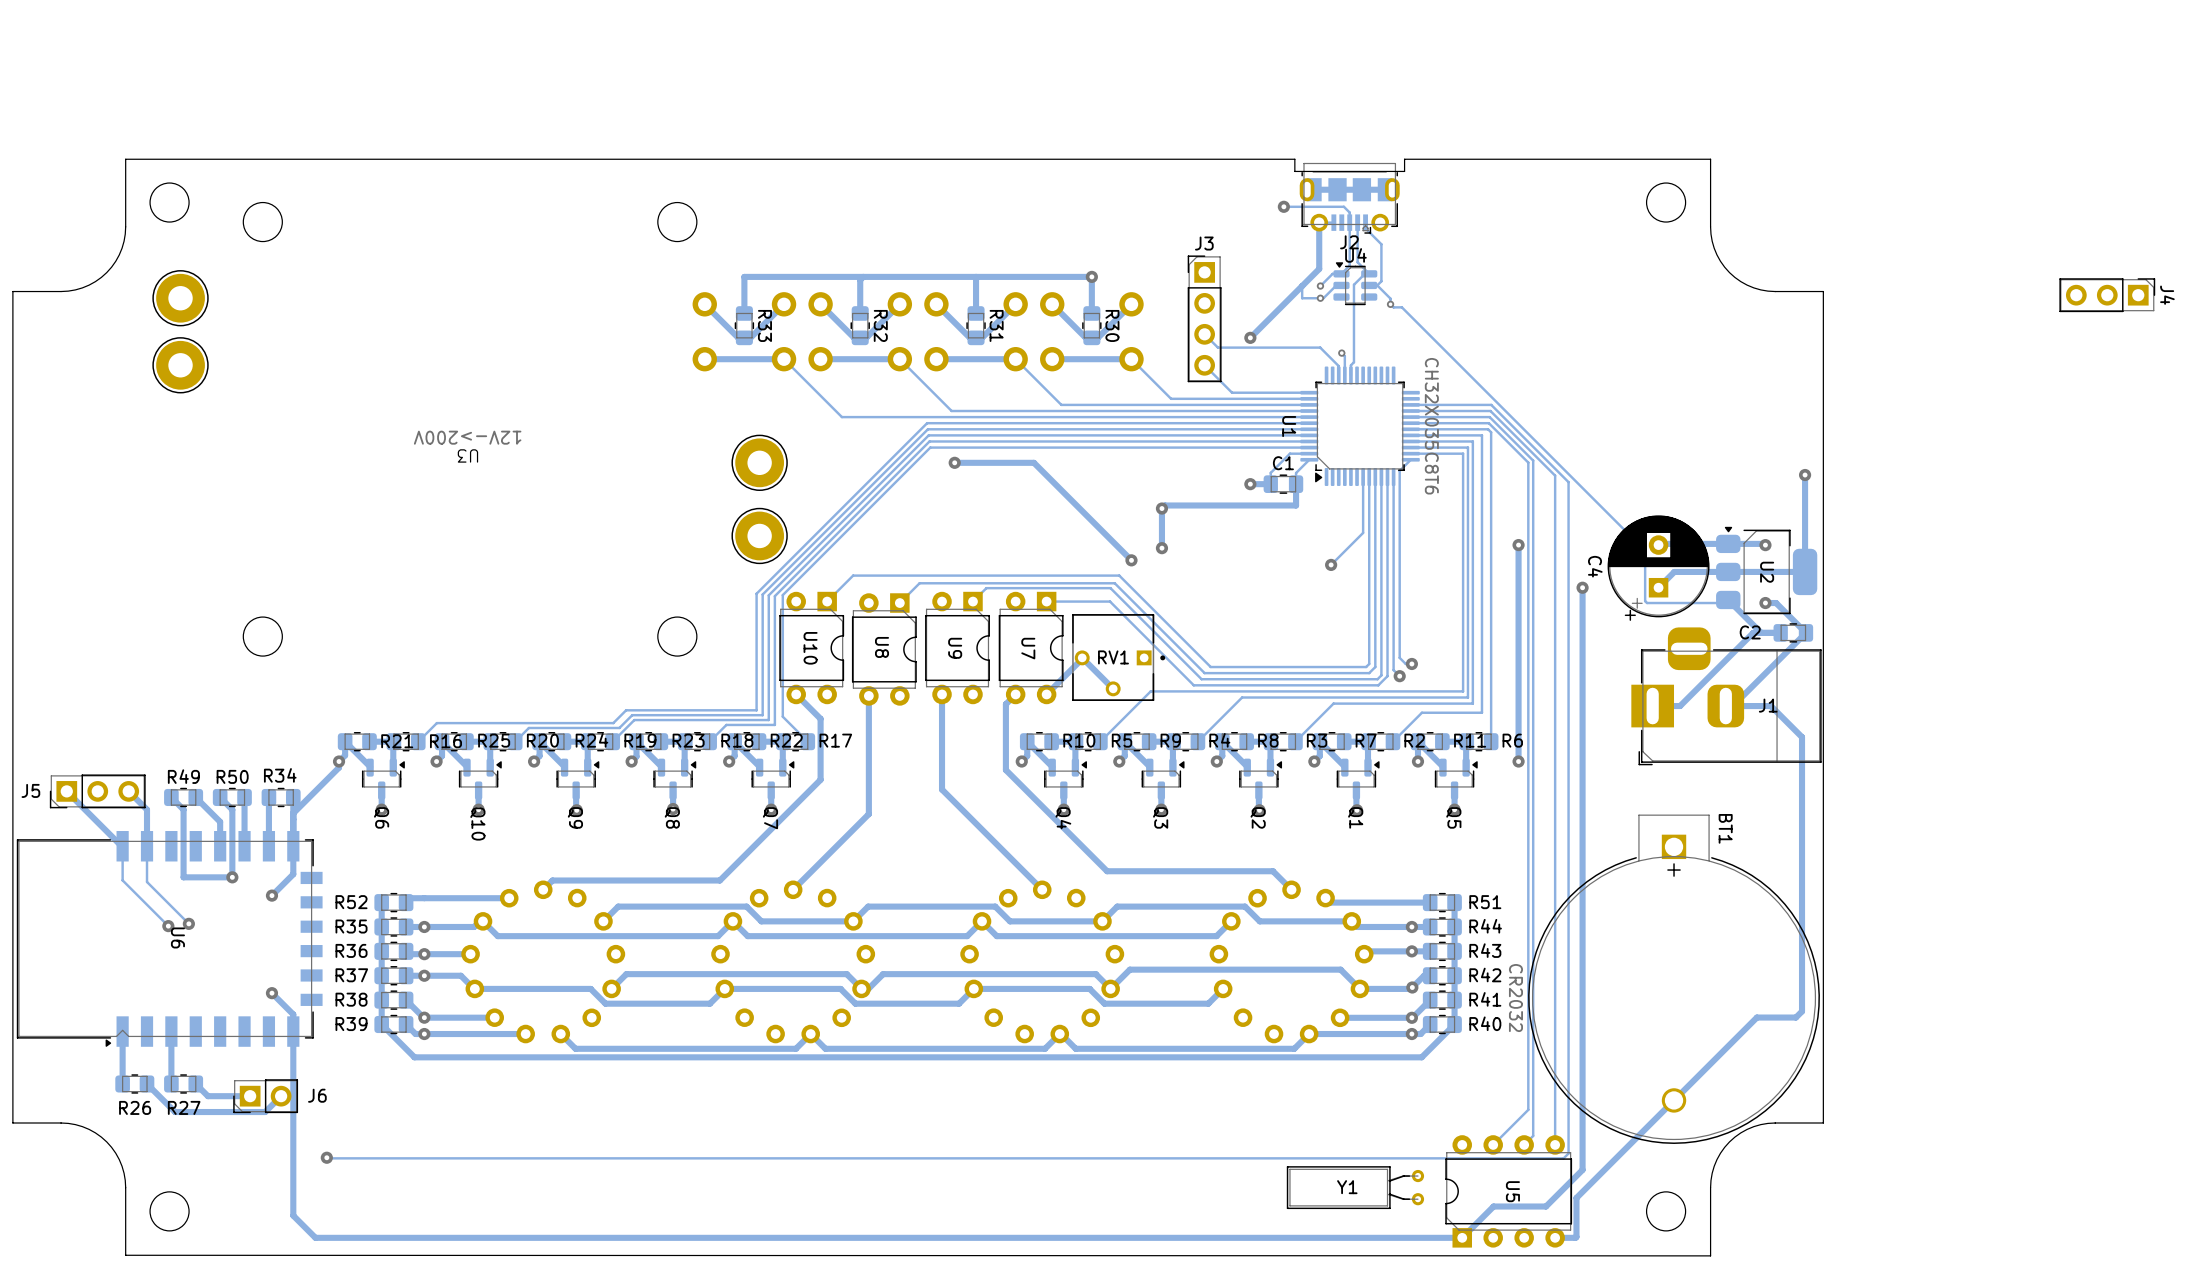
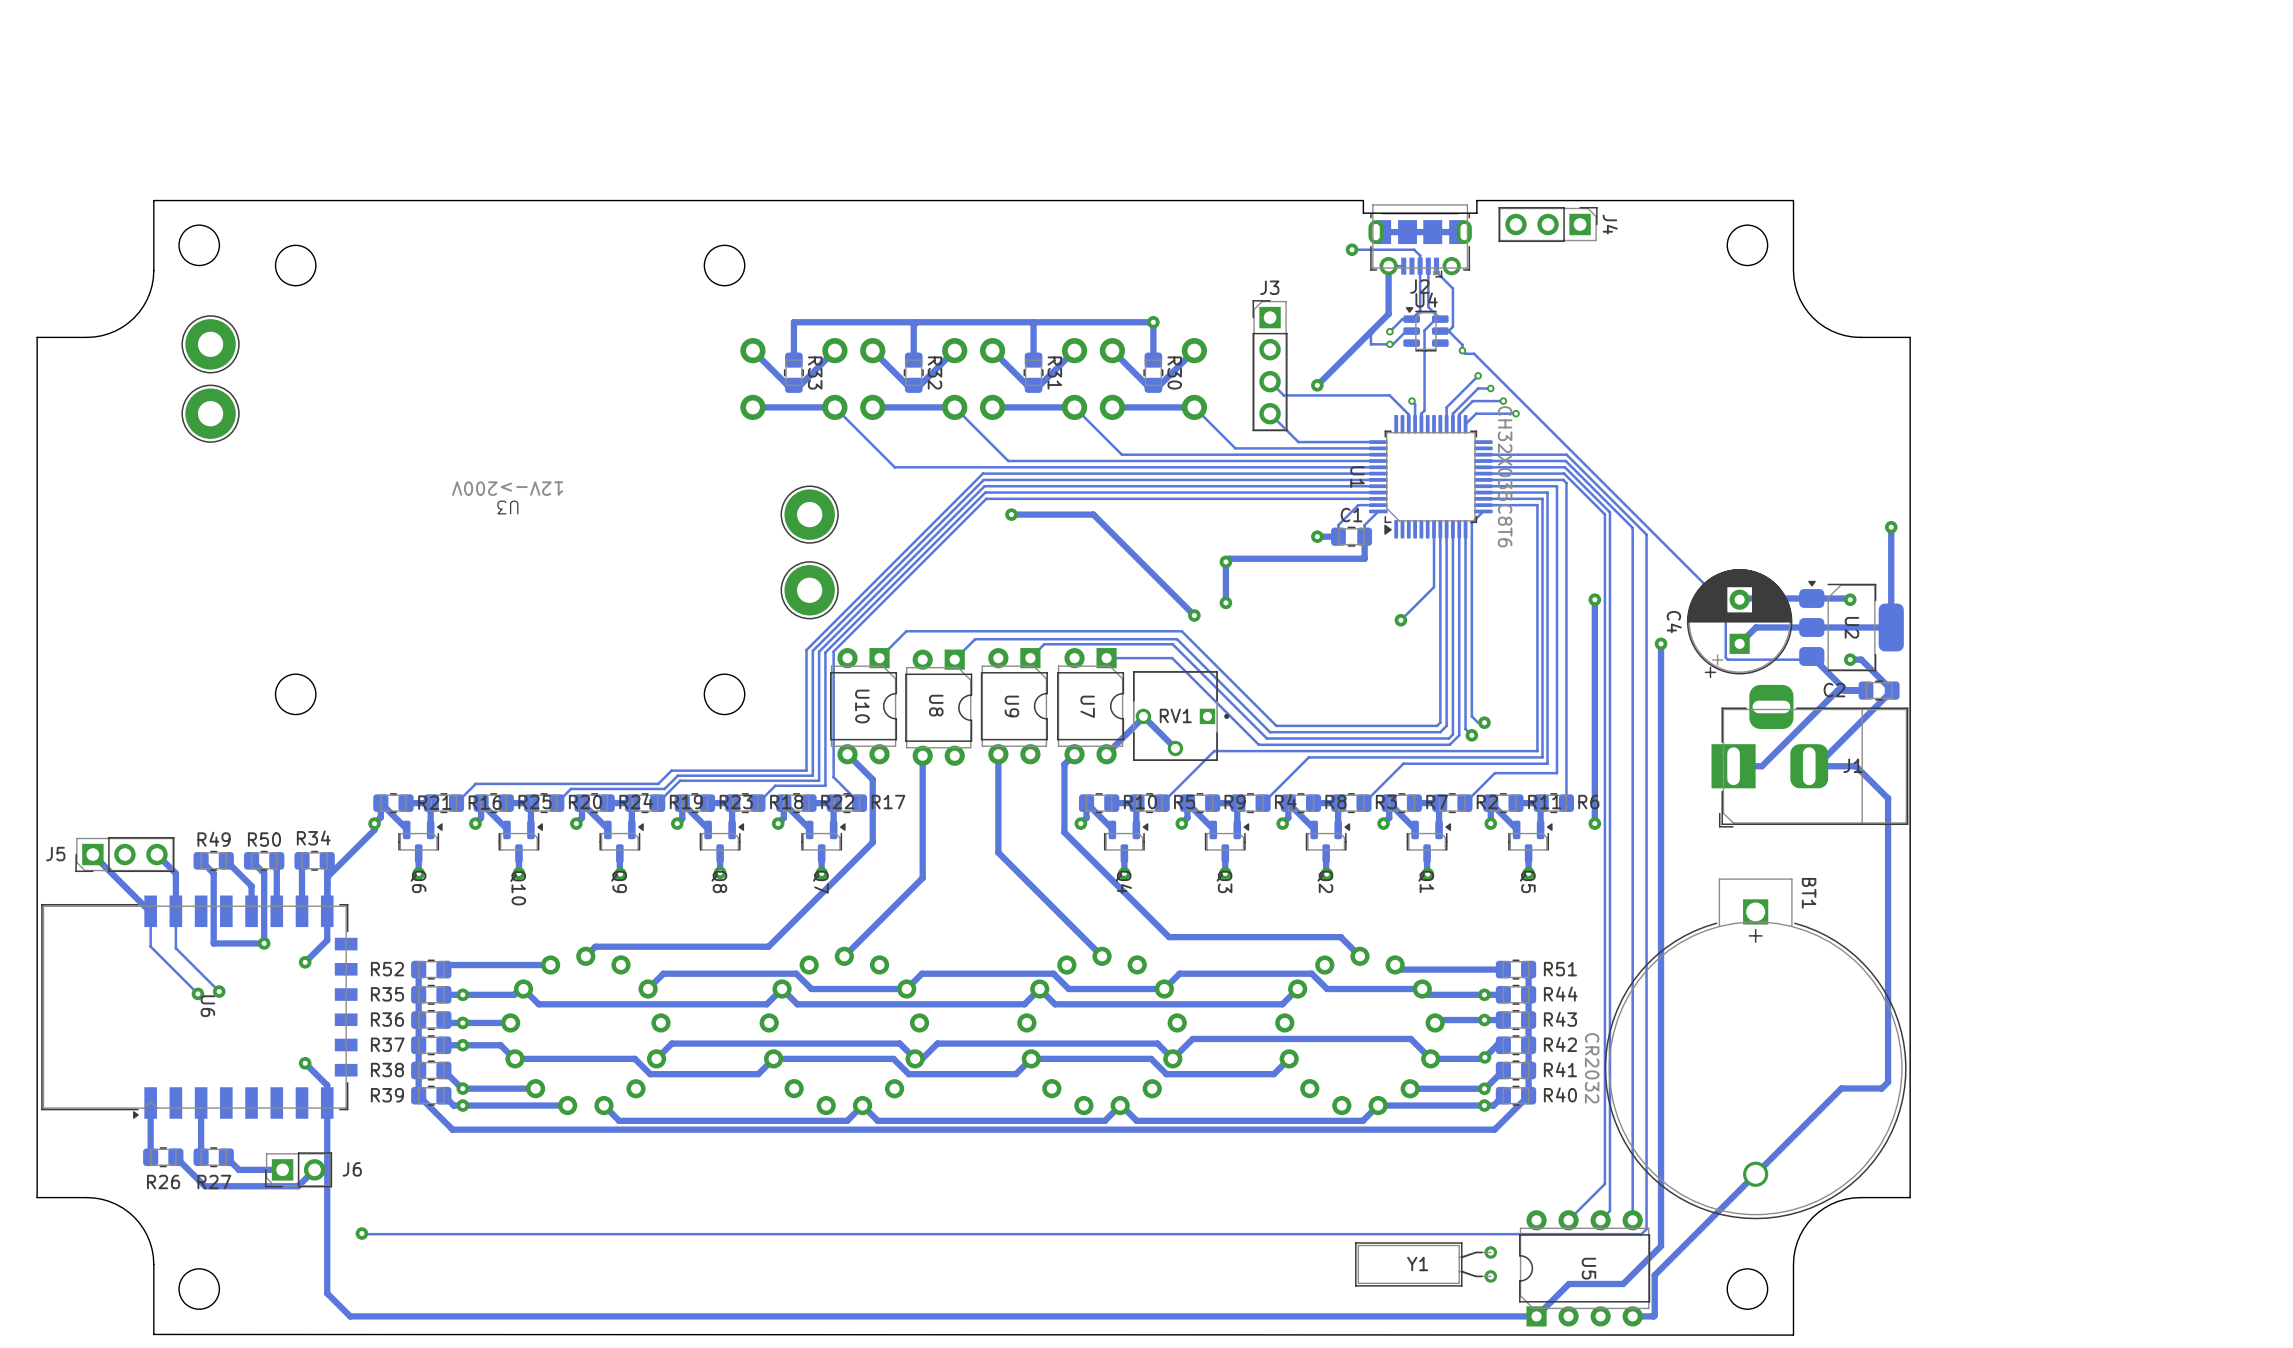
J4 position: (2107, 295) -> (1548, 224)
track: none -> (1478, 375) (1446, 407) (1446, 424)
via: none -> (1478, 375)
track: none -> (1490, 388) (1478, 388) (1452, 413) (1452, 424)
via: none -> (1490, 388)
track: none -> (1503, 401) (1472, 401) (1459, 414) (1459, 424)
via: none -> (1503, 401)
track: none -> (1516, 413) (1476, 413) (1465, 424)
via: none -> (1516, 413)

